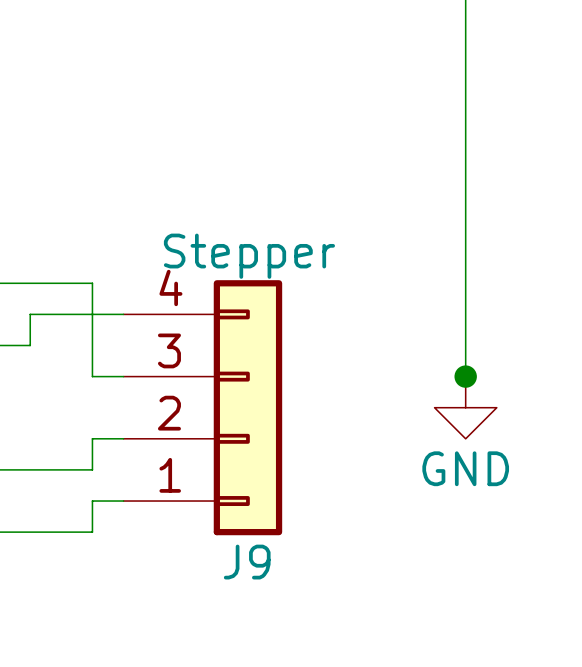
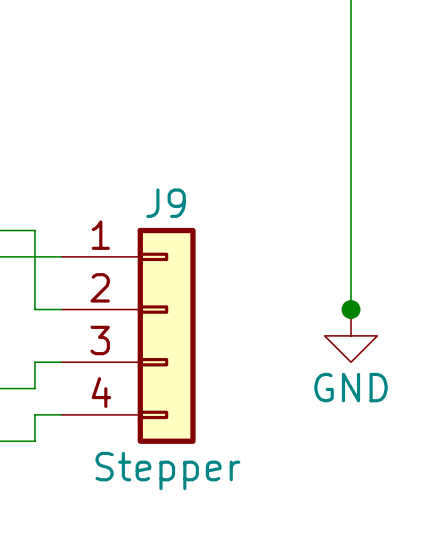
J9 flip: as is (247, 407) -> up-down (166, 335)

